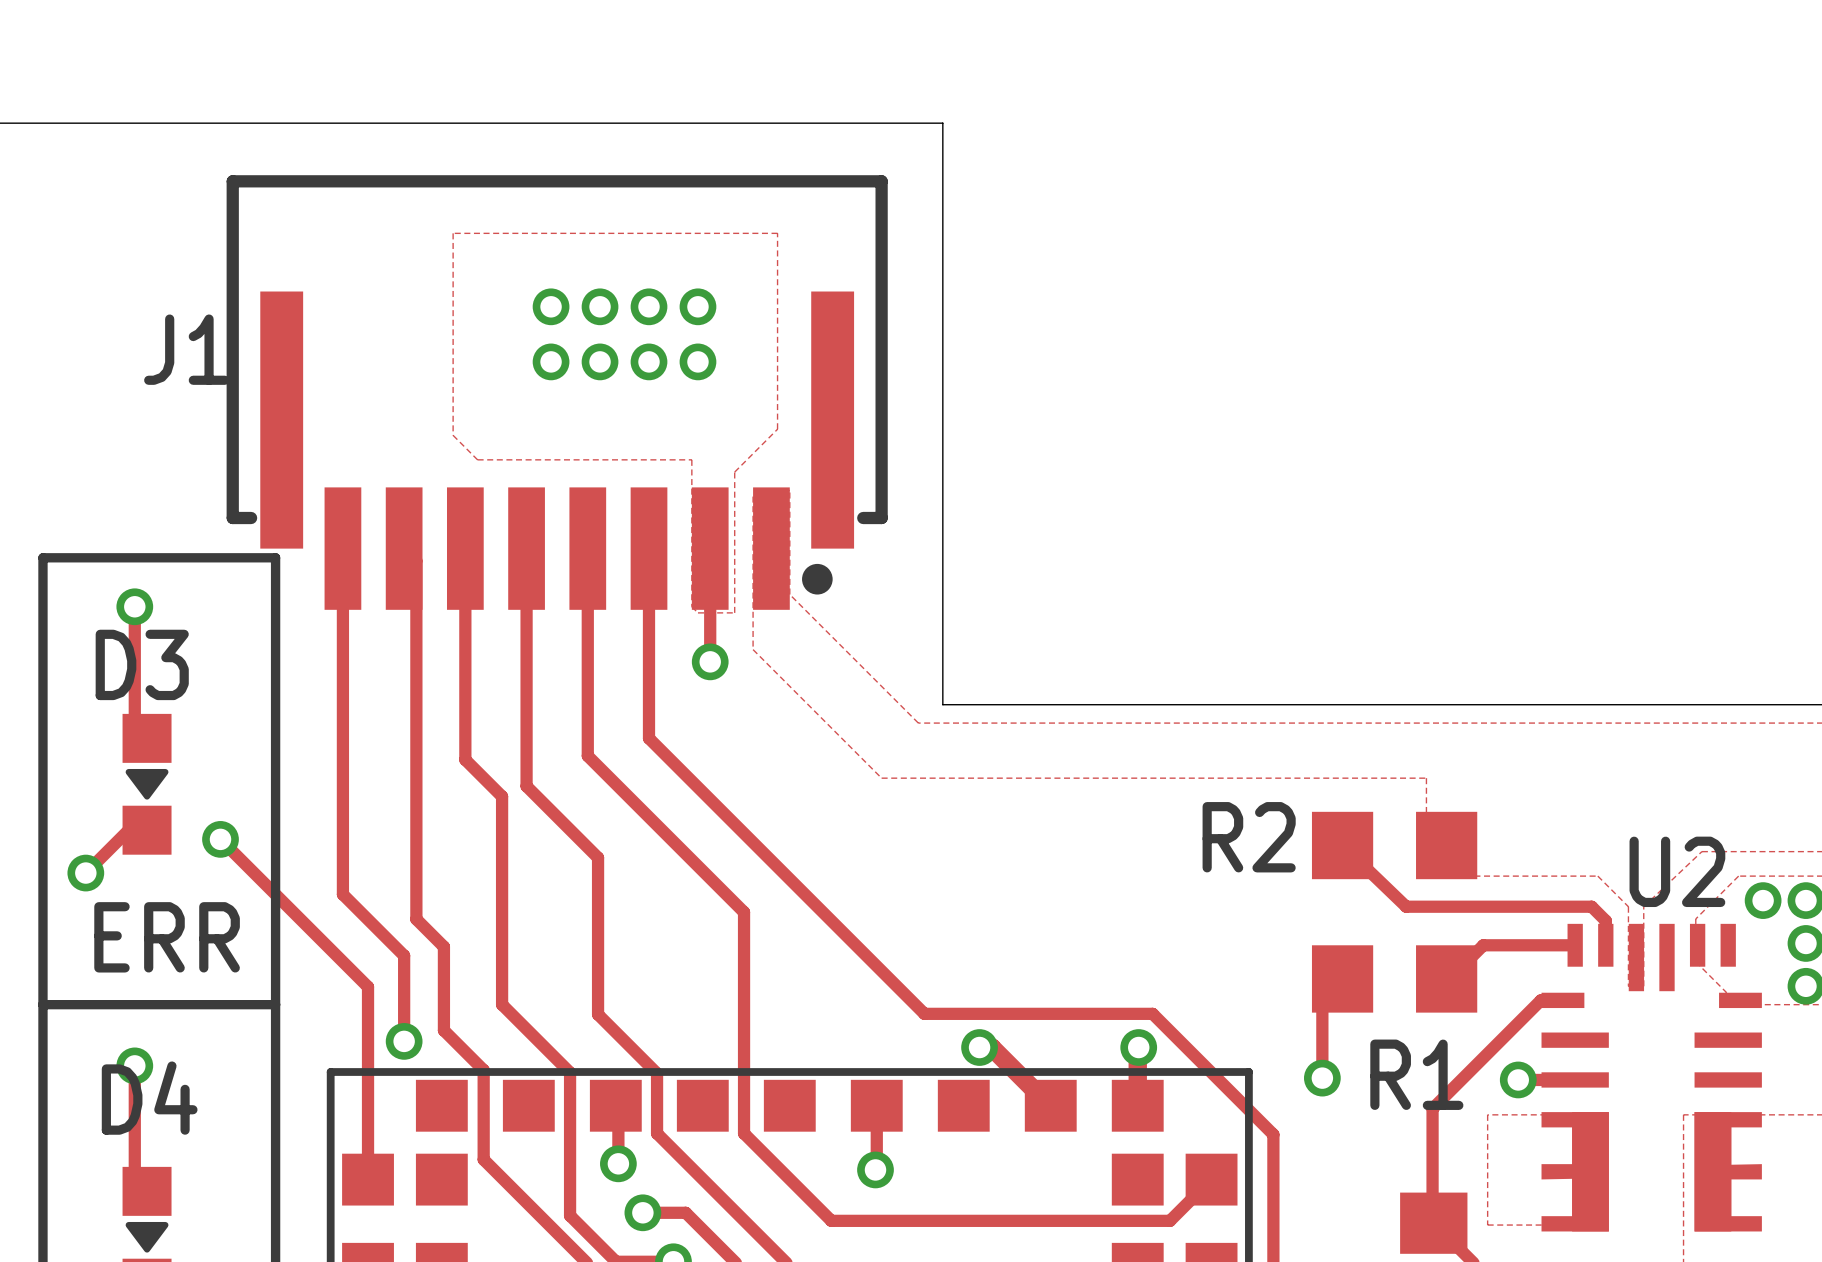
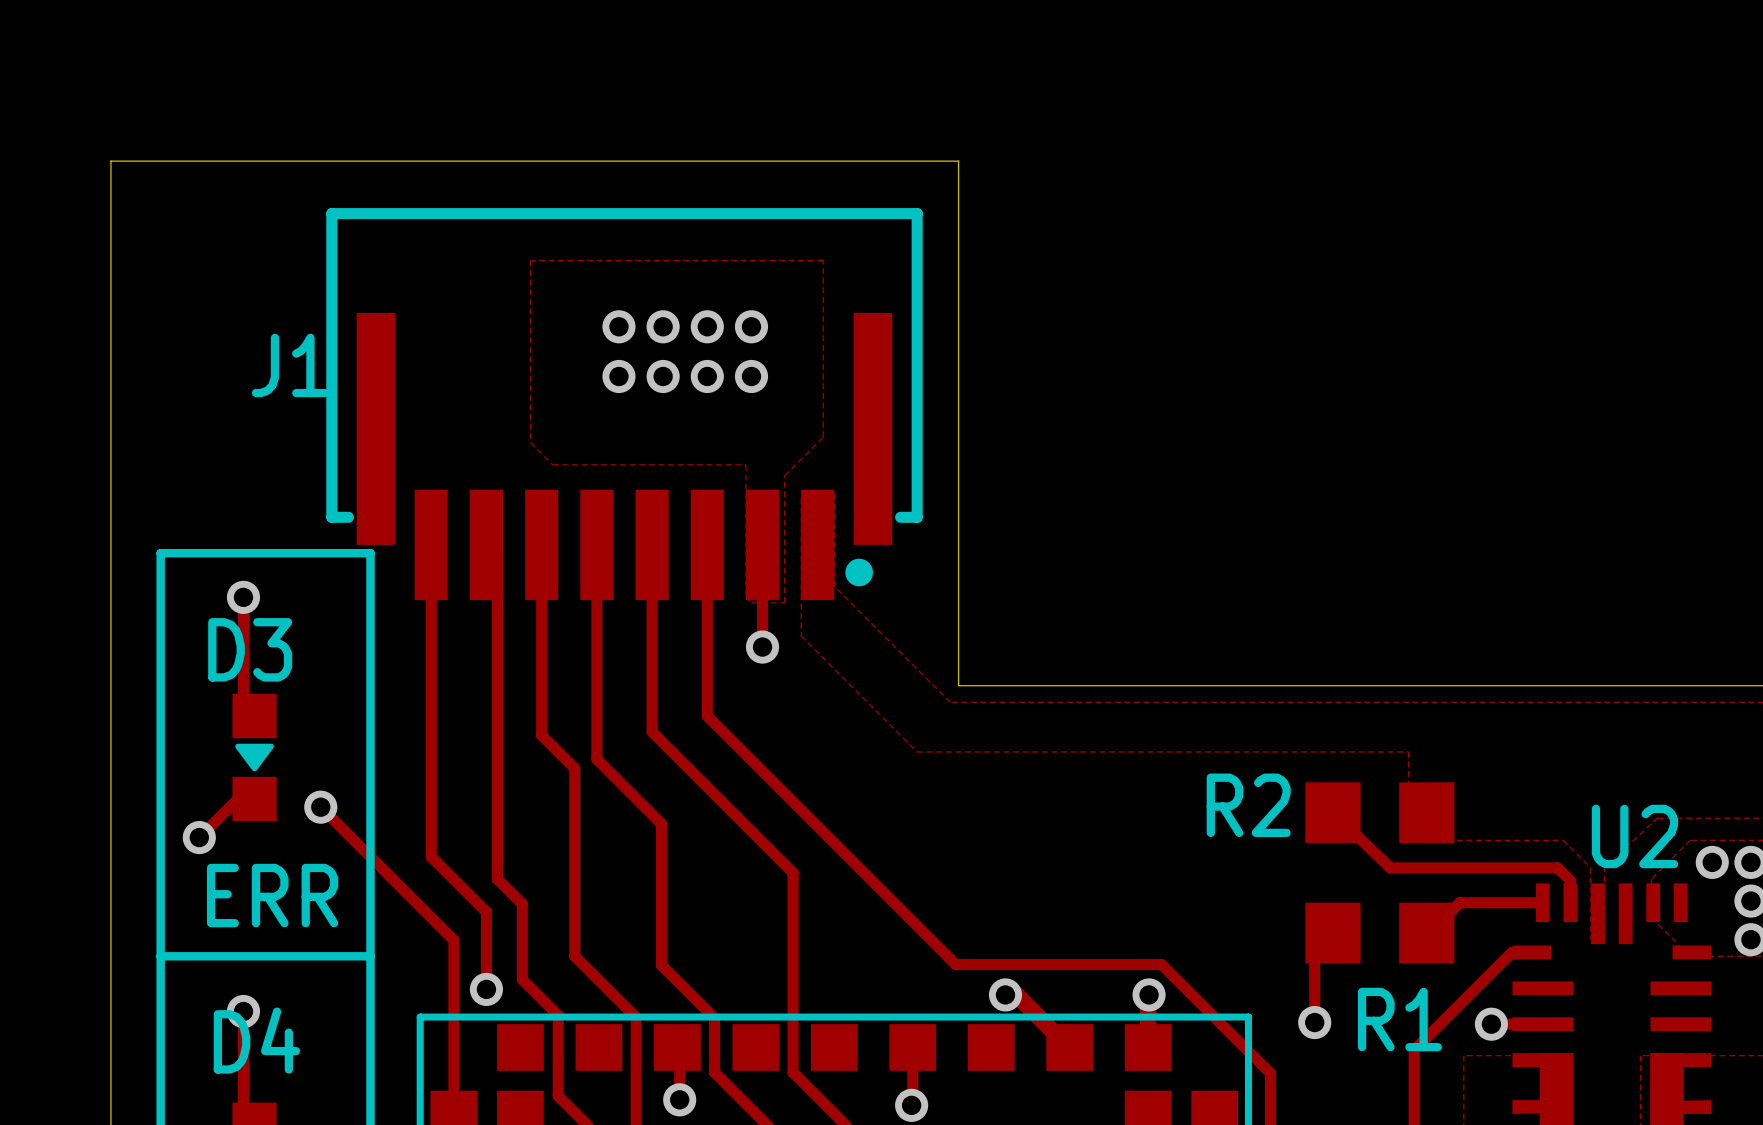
board edge: (927, 123) (942, 123) (942, 704) -> (958, 161) (958, 685) (972, 685)

